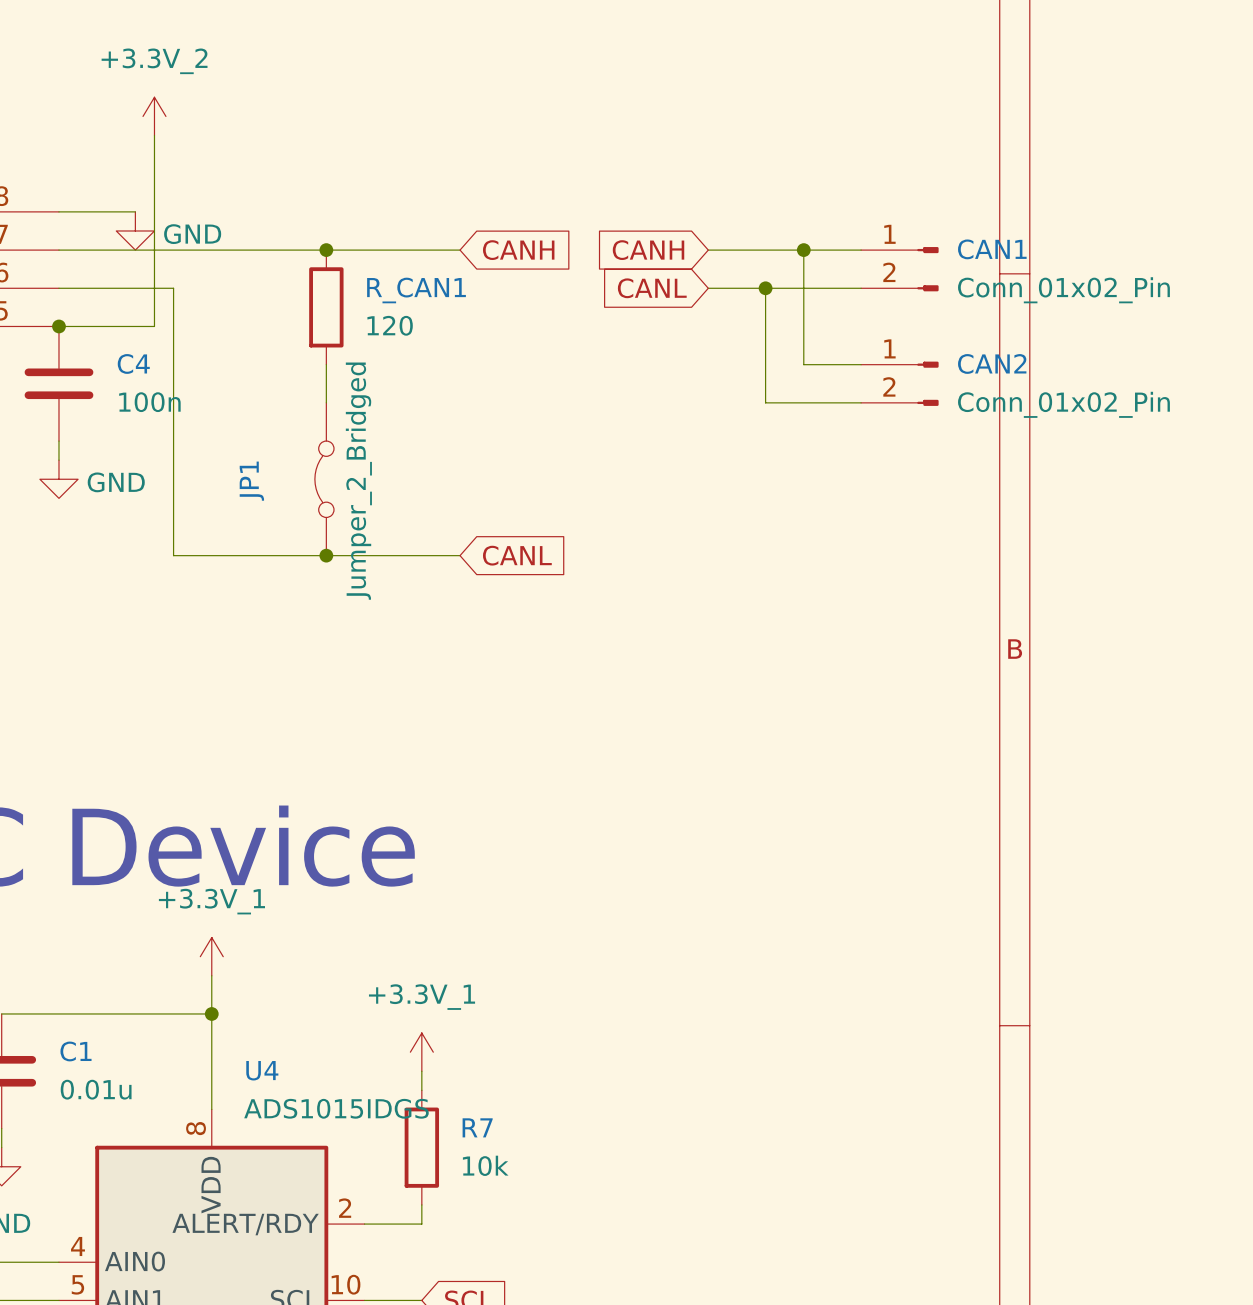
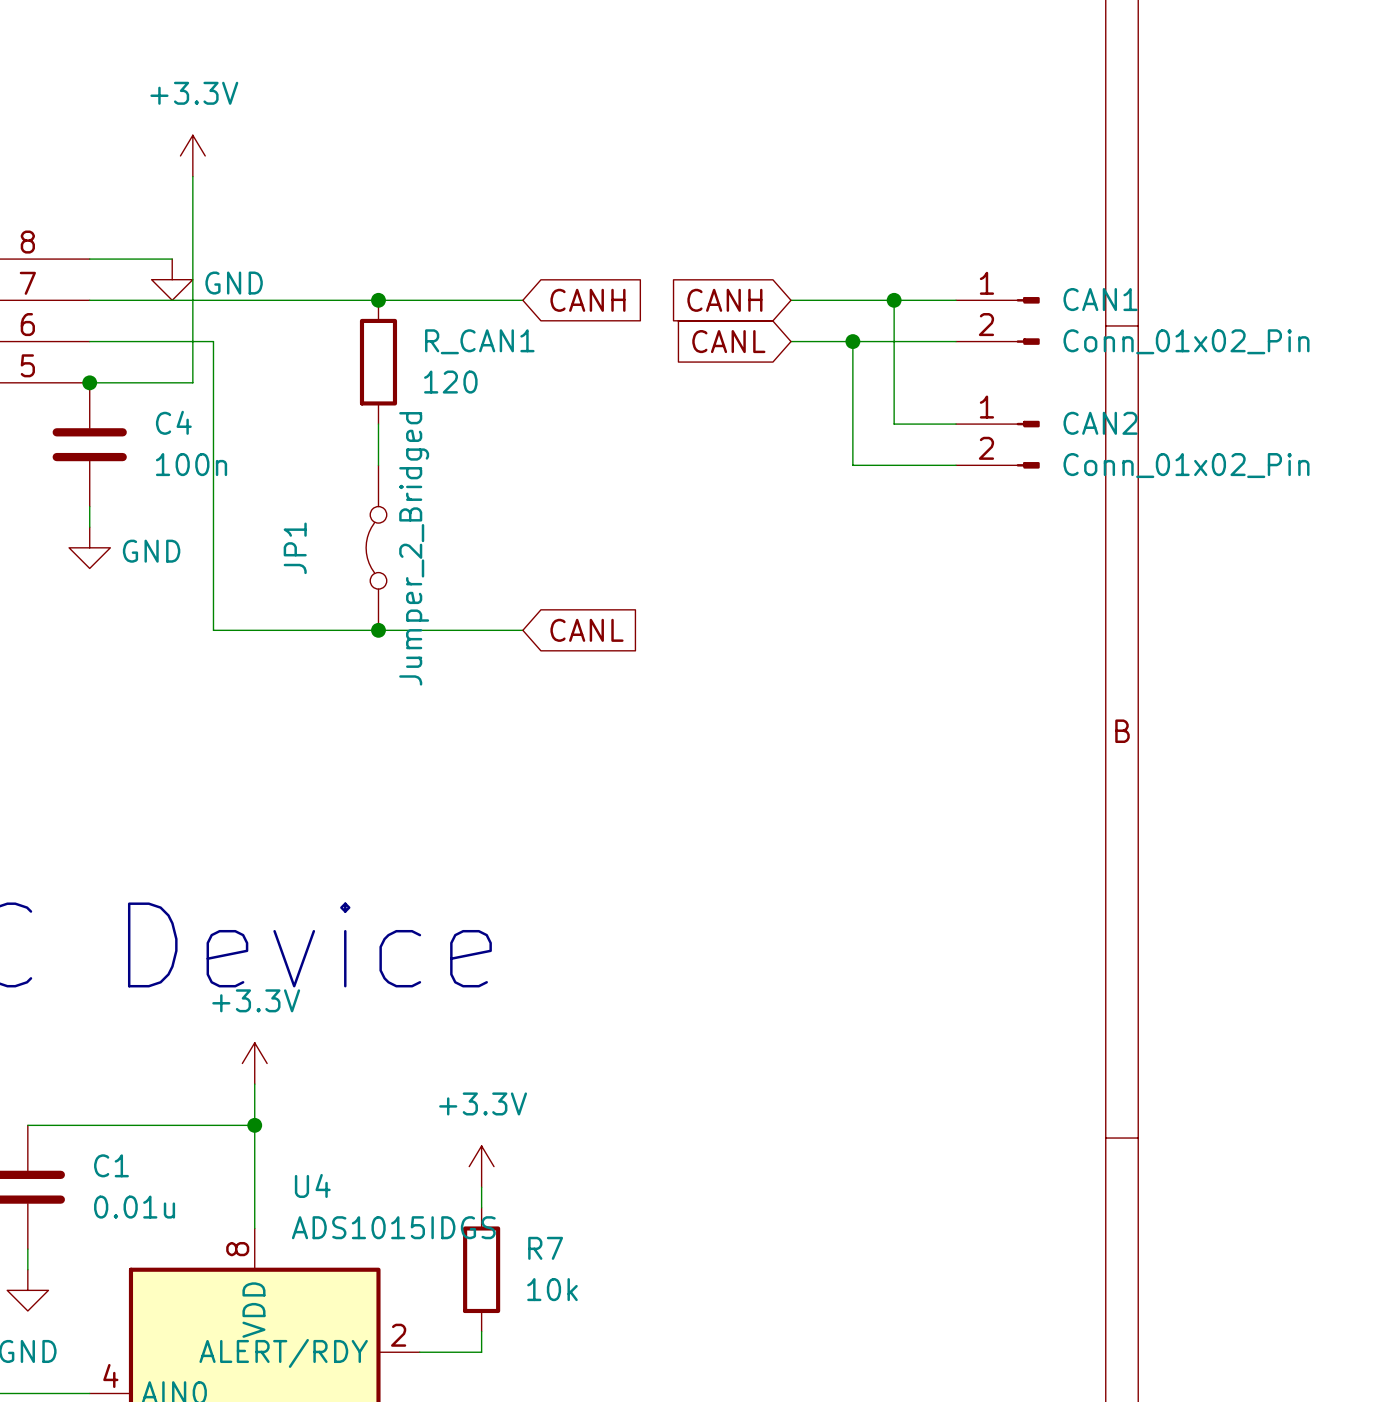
power symbol: +3.3V_2 (154, 116) -> +3.3V (192, 155)
power symbol: +3.3V_1 (211, 956) -> +3.3V (254, 1063)
power symbol: +3.3V_1 (421, 1052) -> +3.3V (481, 1166)

